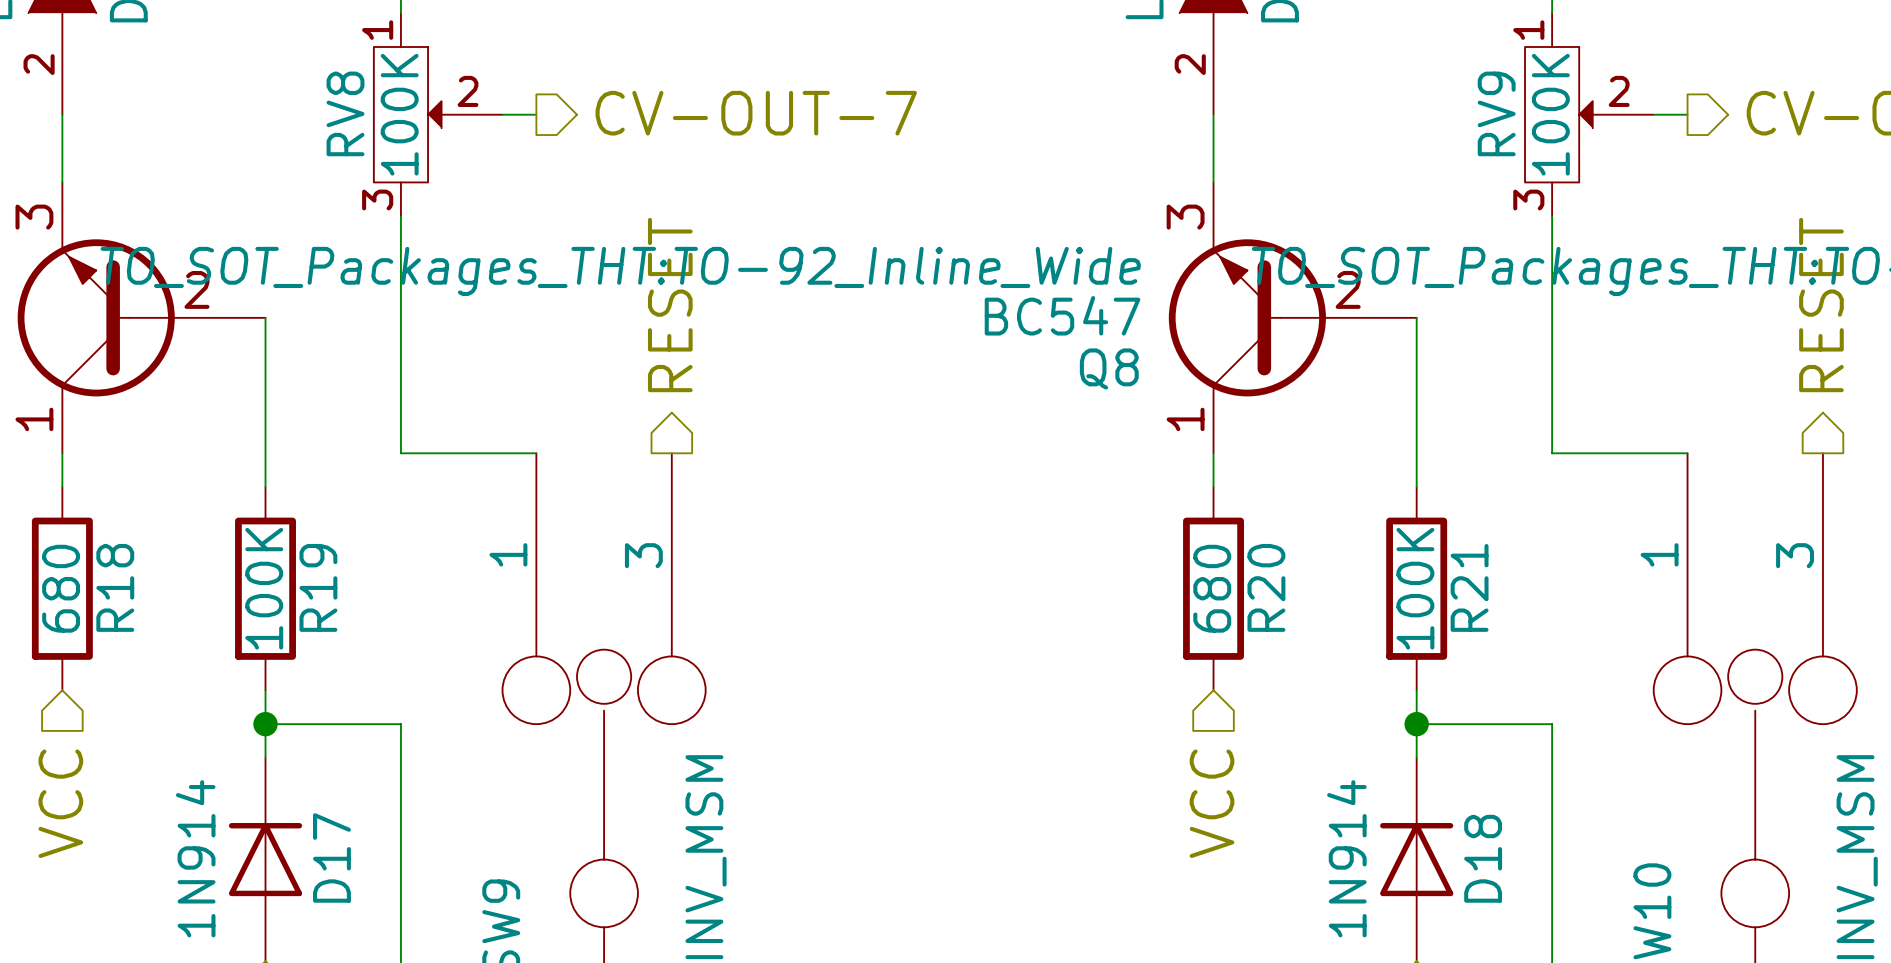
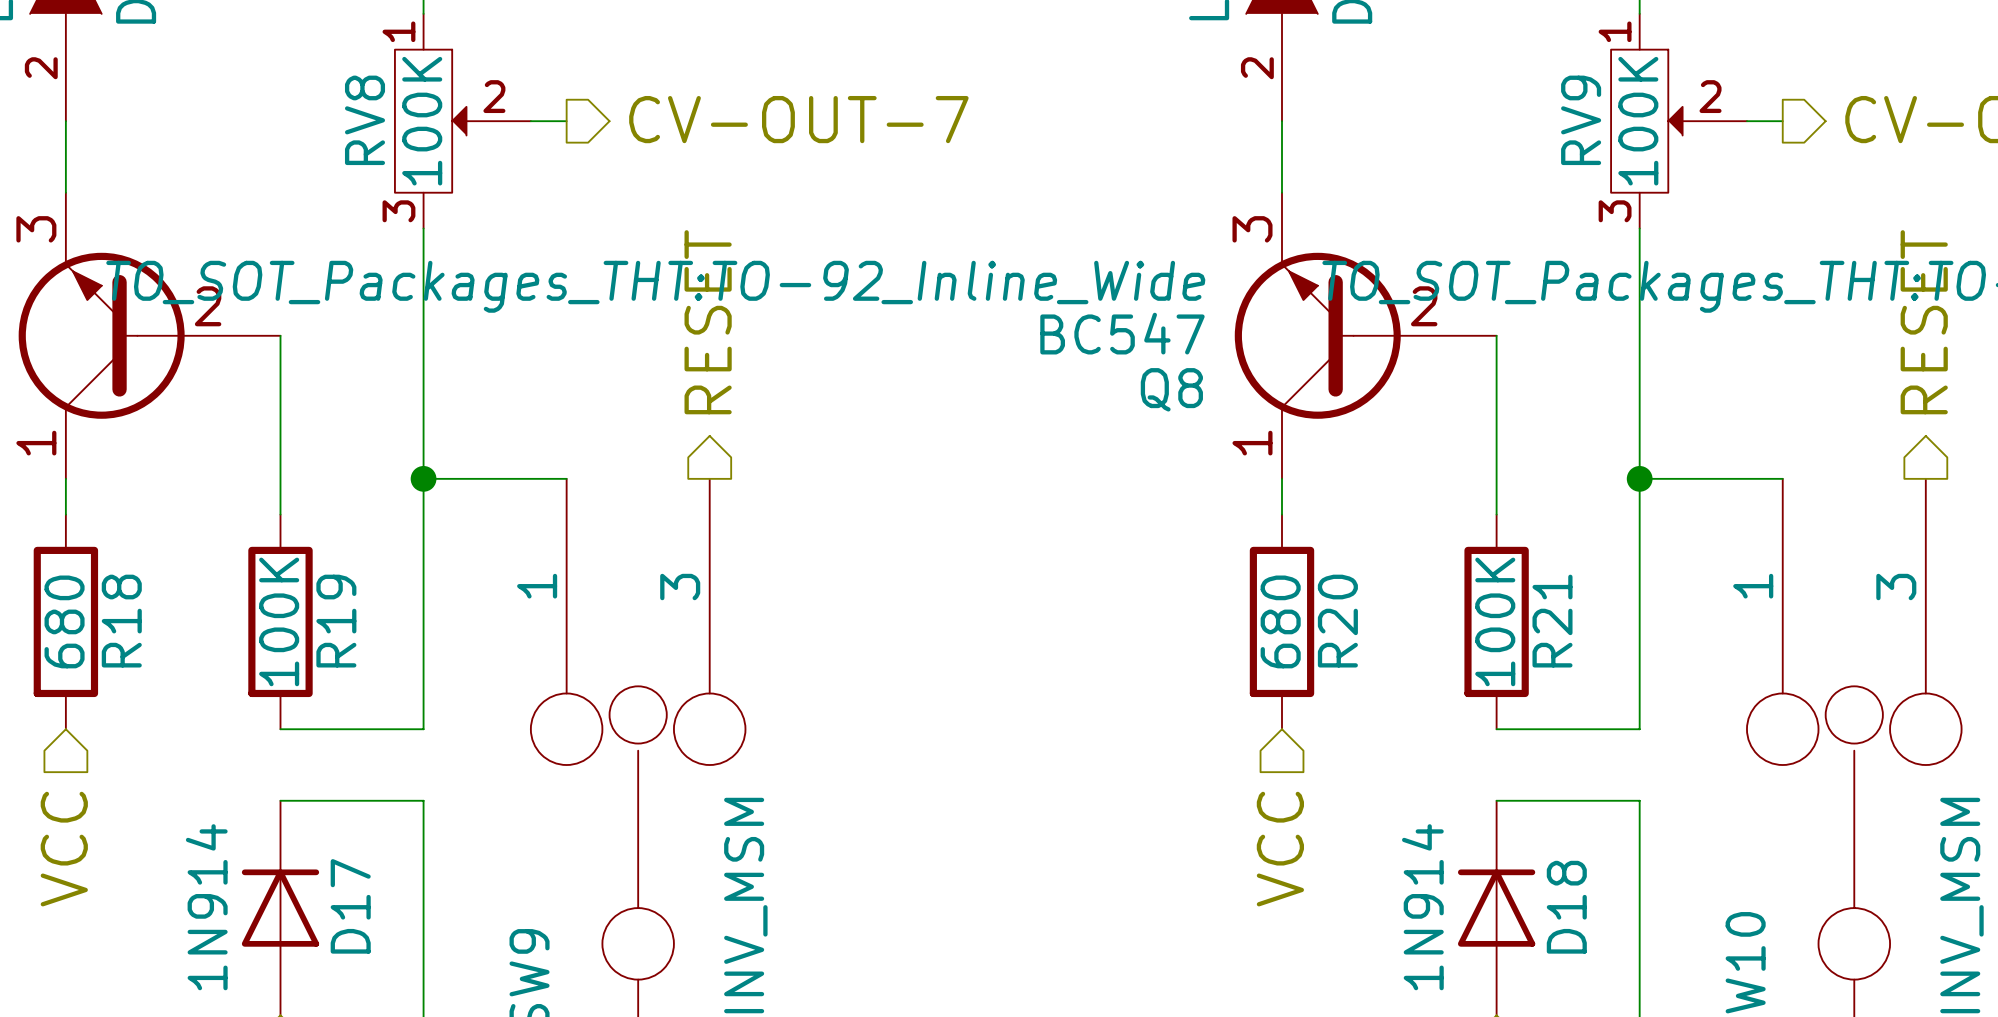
junction: none -> (423, 478)
junction: none -> (1639, 478)
wire: (265, 690) (265, 758) -> (280, 729) (423, 729) (423, 478)
wire: (1416, 690) (1416, 758) -> (1496, 729) (1639, 729) (1639, 478)
wire: (265, 724) (400, 724) (400, 758) -> (280, 800) (423, 800)
junction: (265, 724) -> none
wire: (1416, 724) (1552, 724) (1552, 758) -> (1496, 800) (1639, 800)
junction: (1416, 724) -> none

